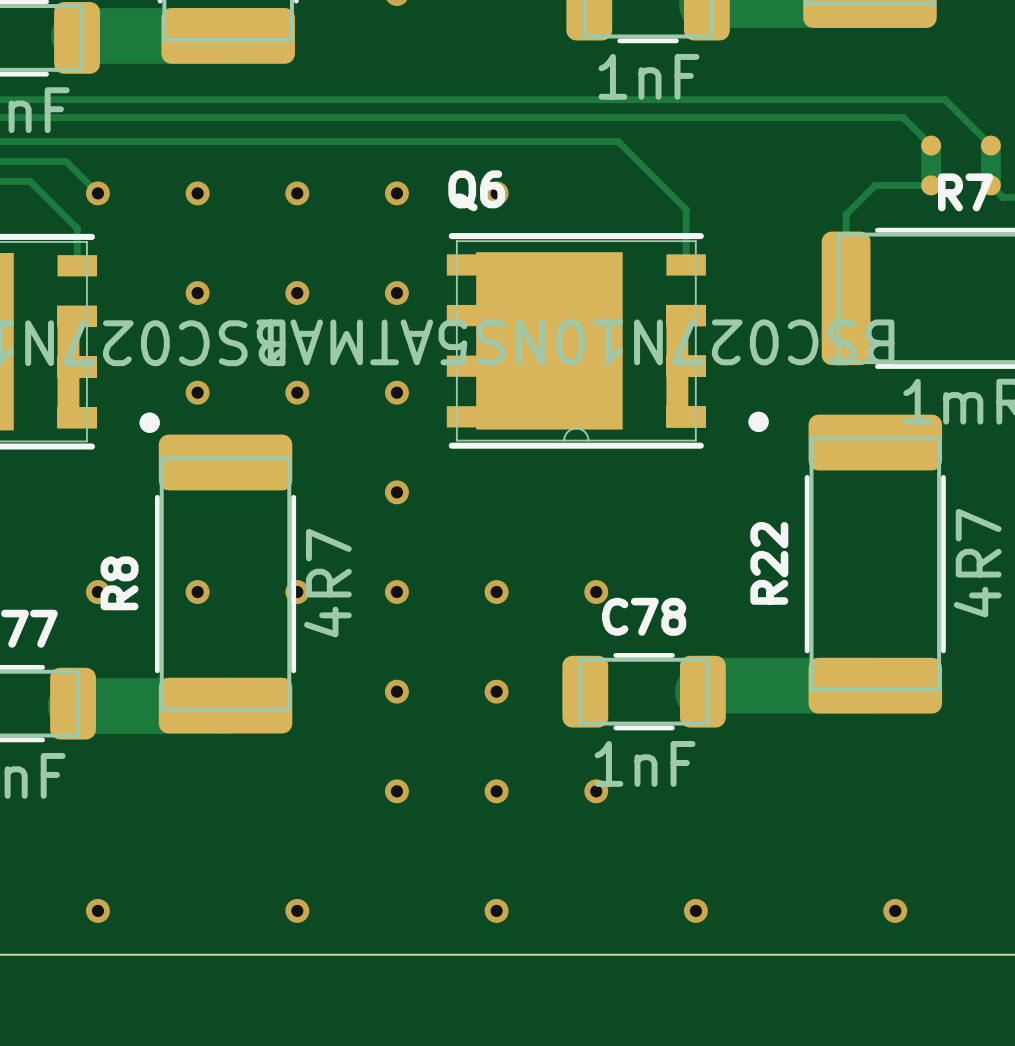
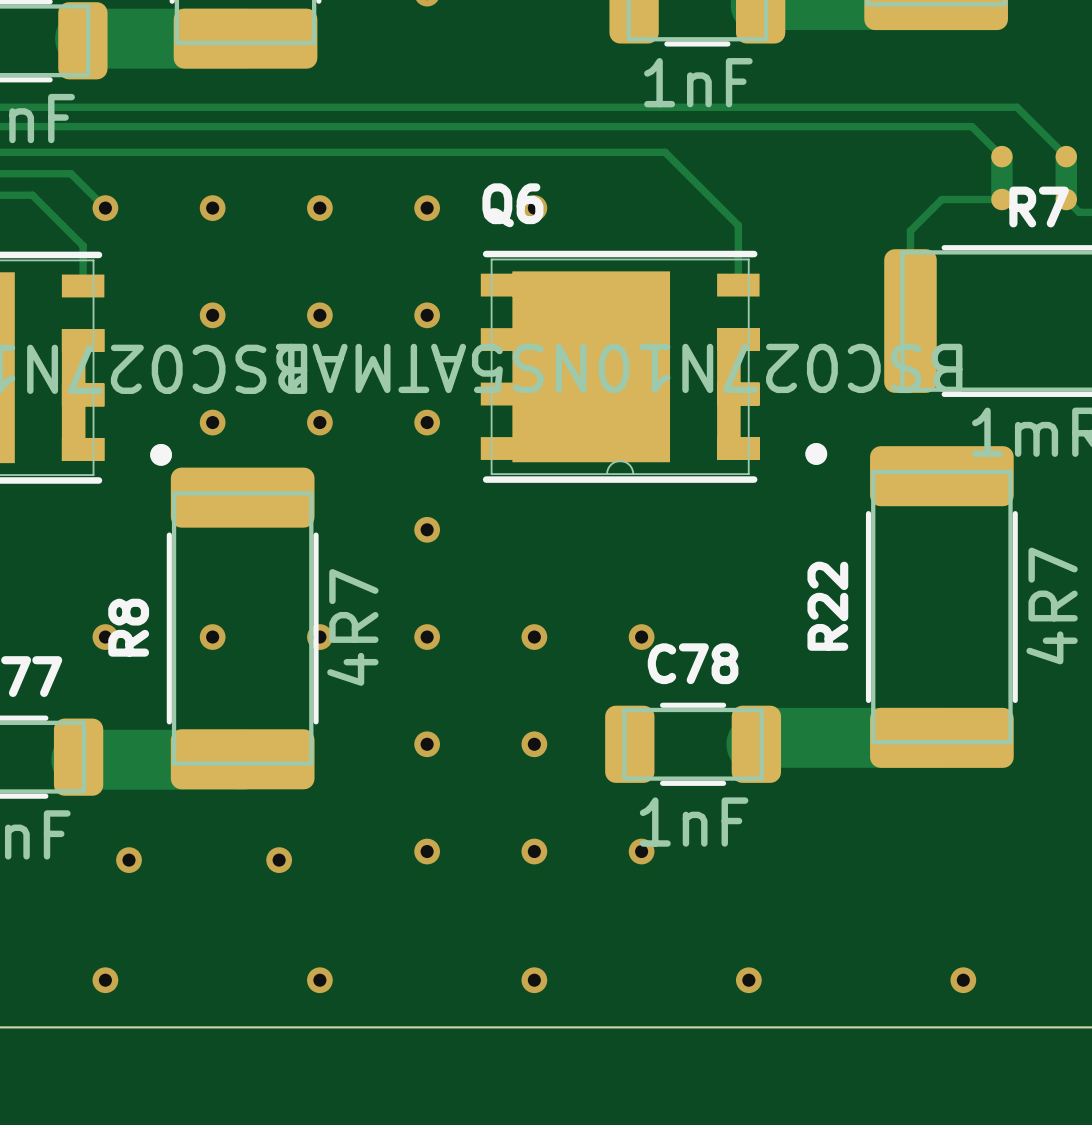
via: none -> (129, 860)
via: none -> (279, 860)

